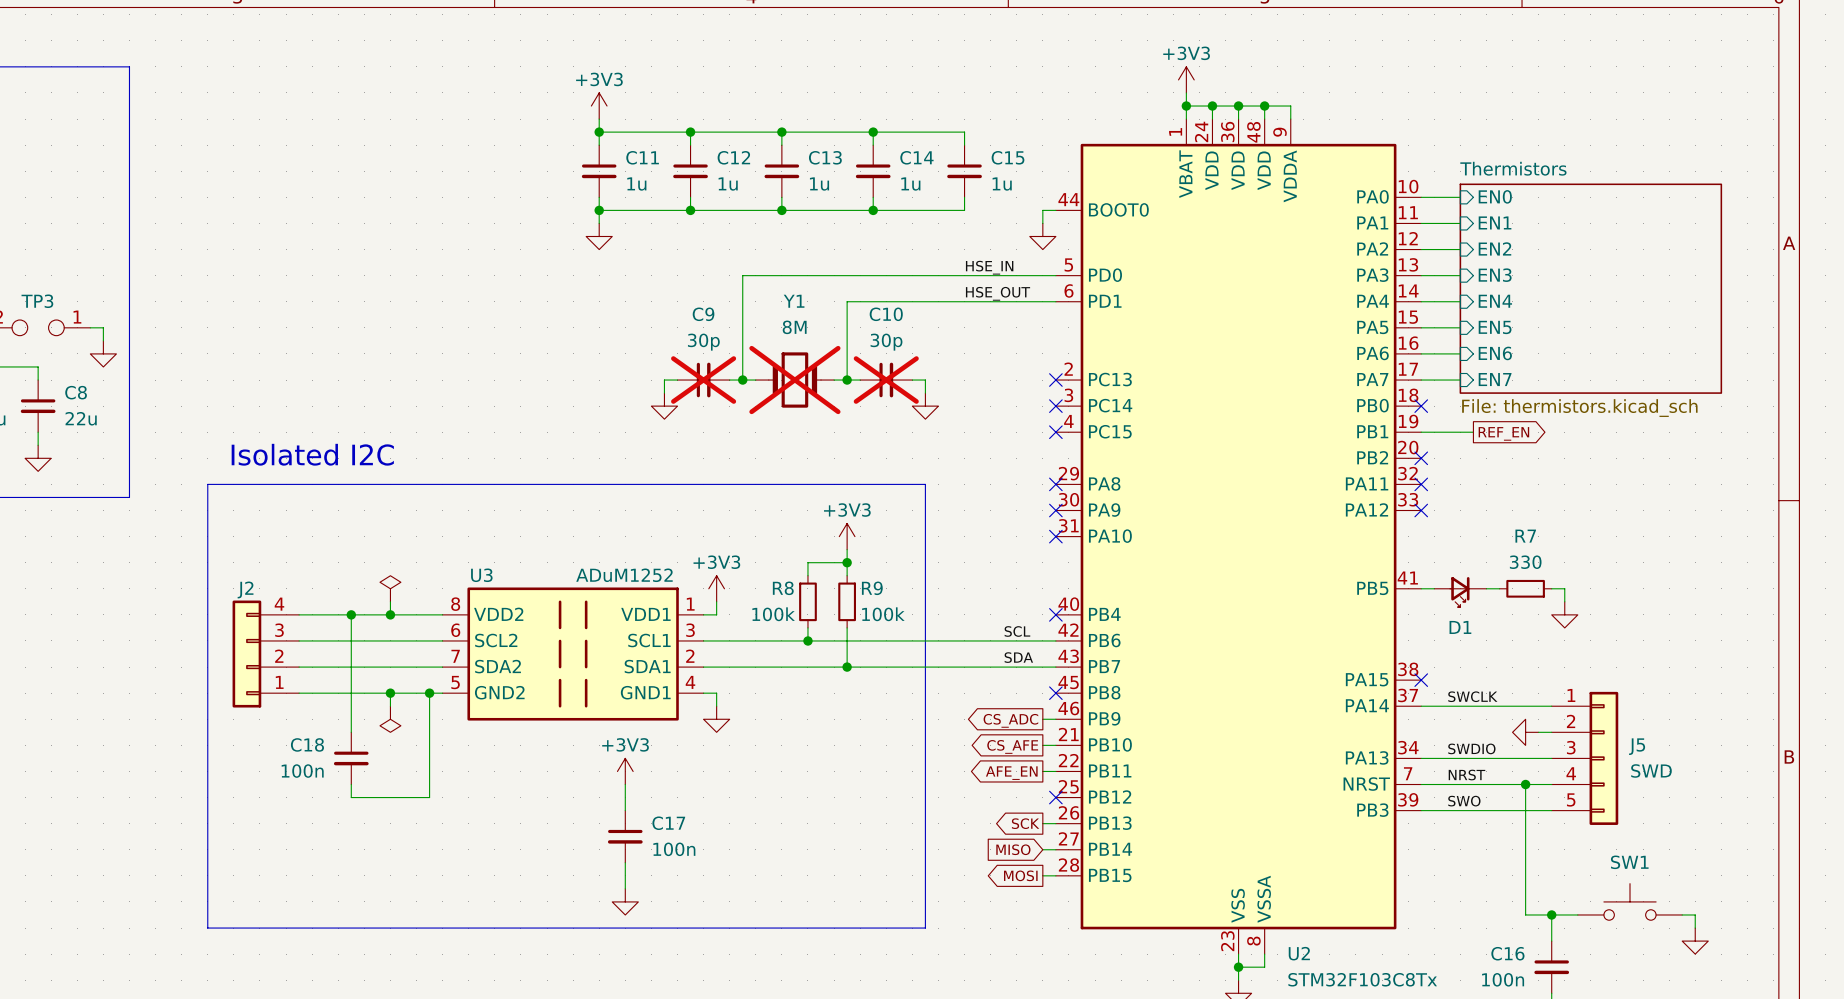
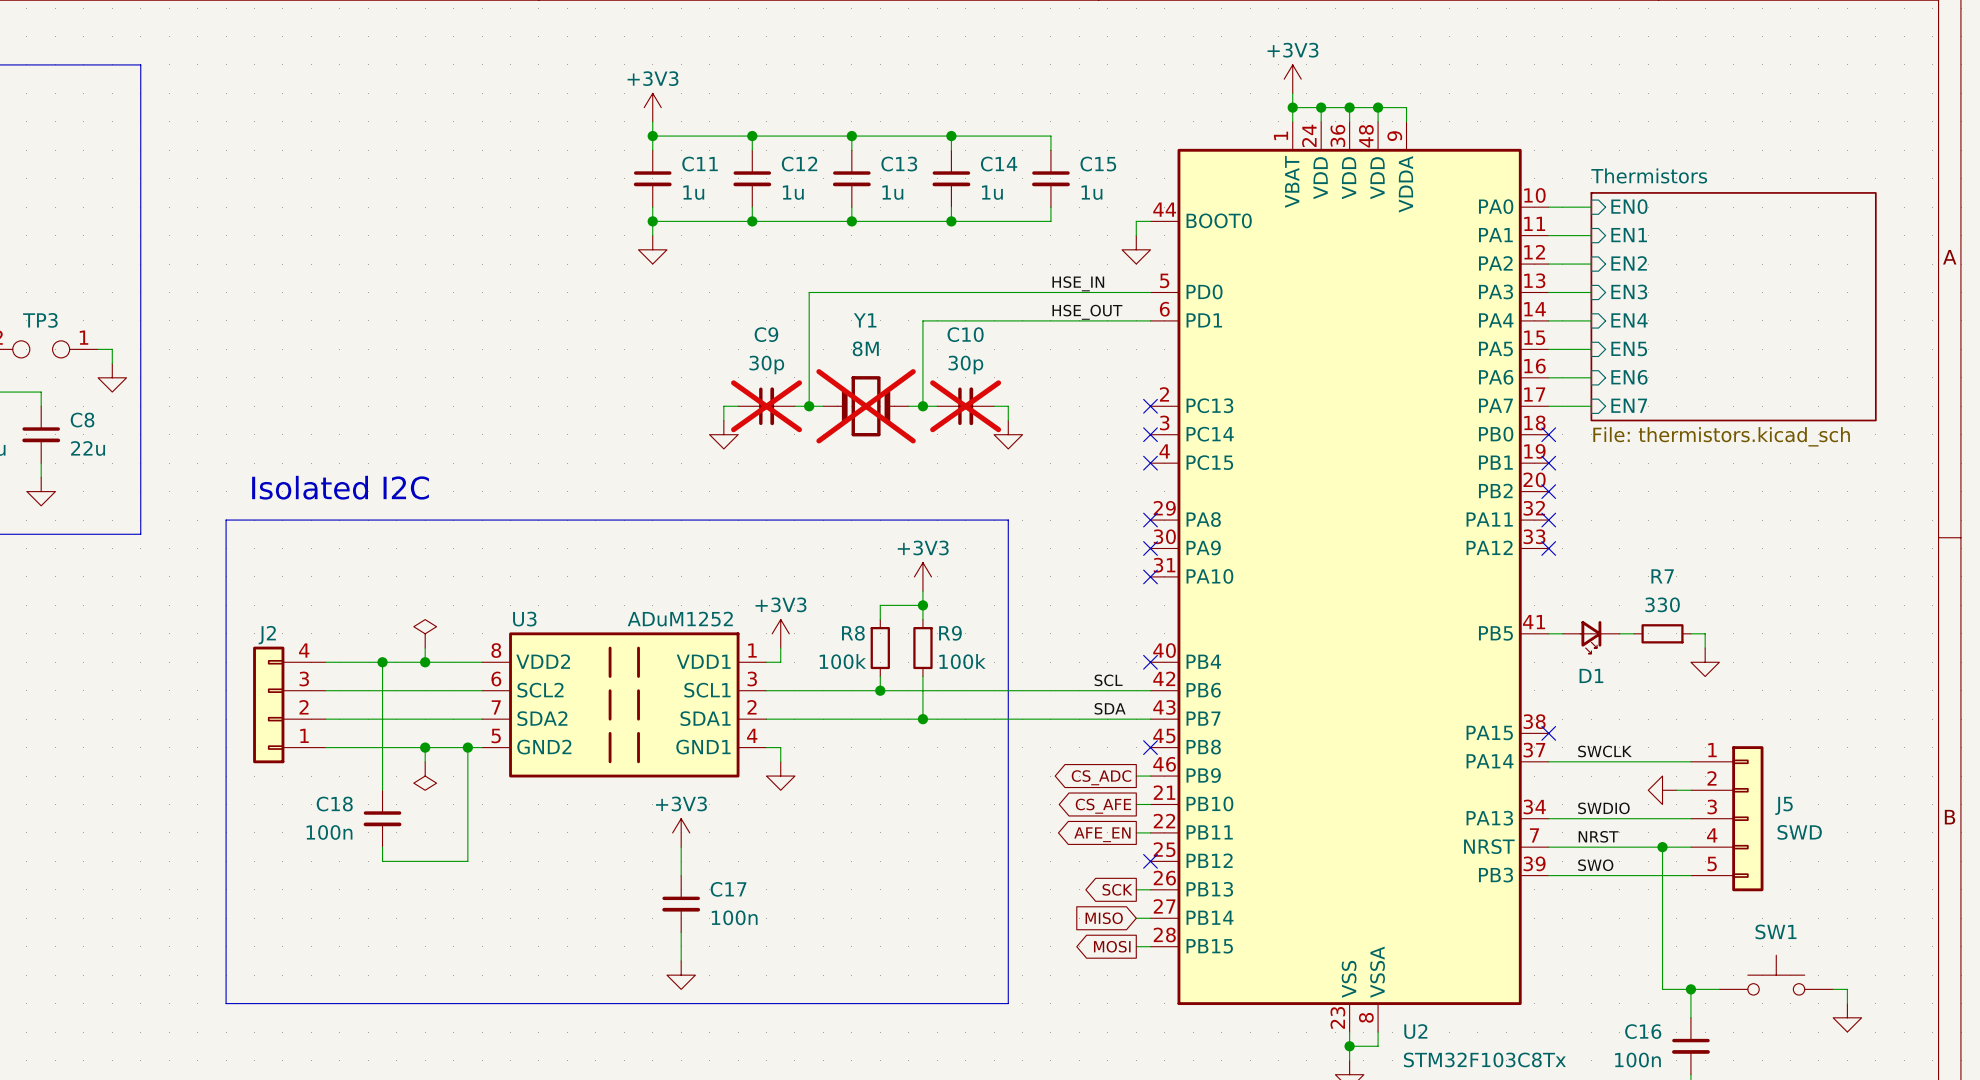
wire: (1421, 432) (1473, 432) -> none
no-connect mark: none -> (1548, 463)
global label: REF_EN (1503, 433) -> none

